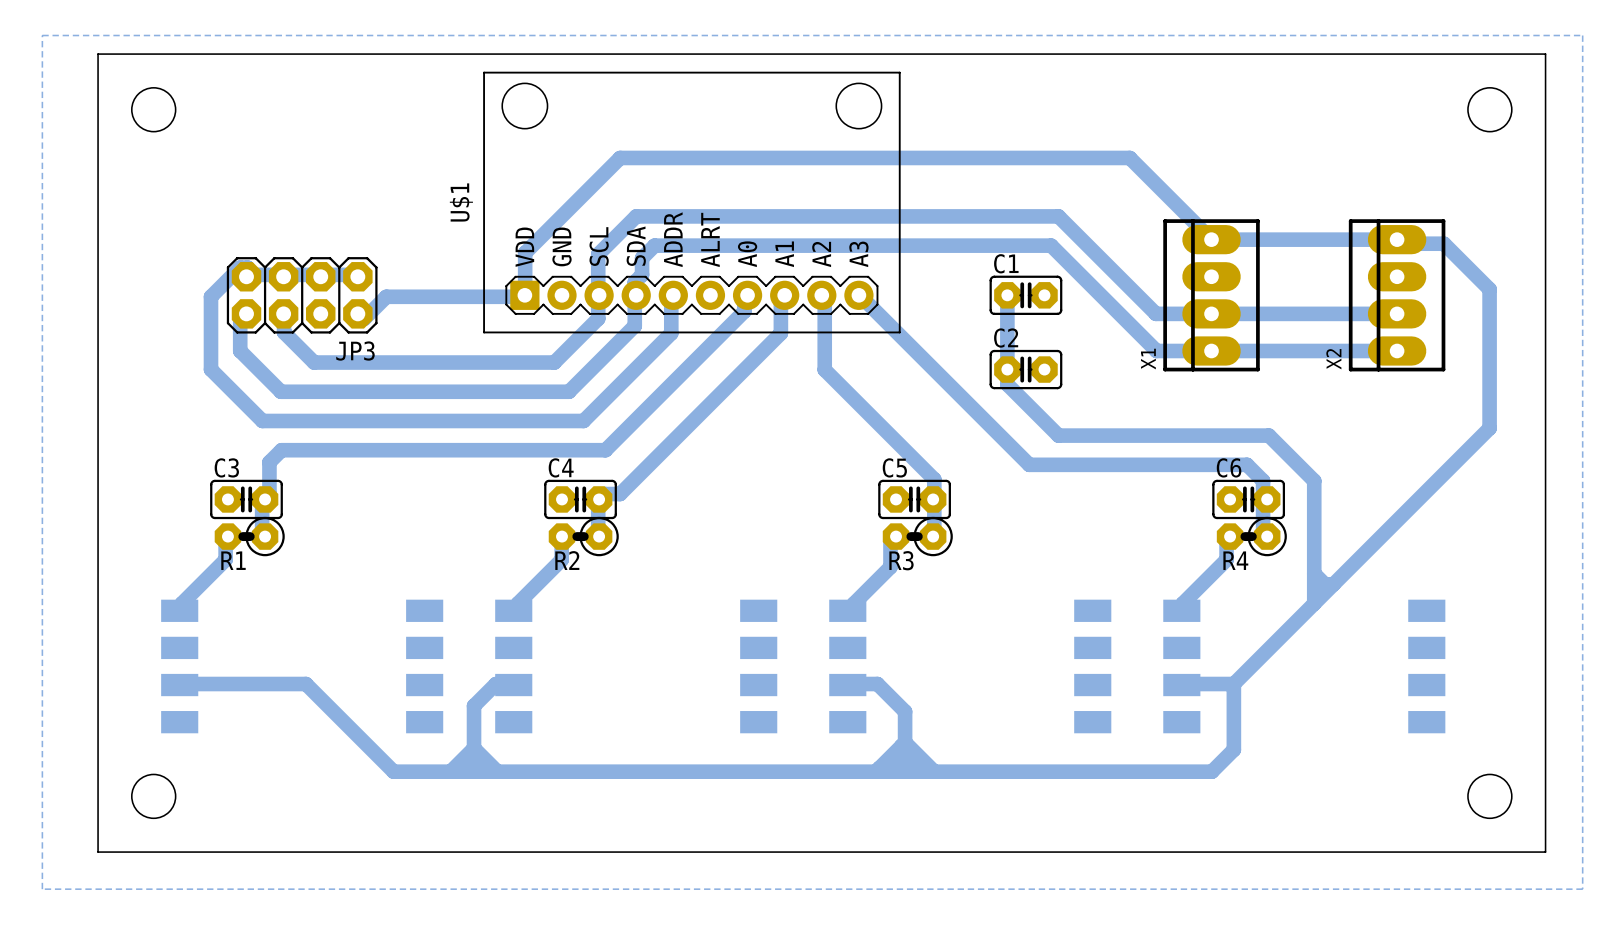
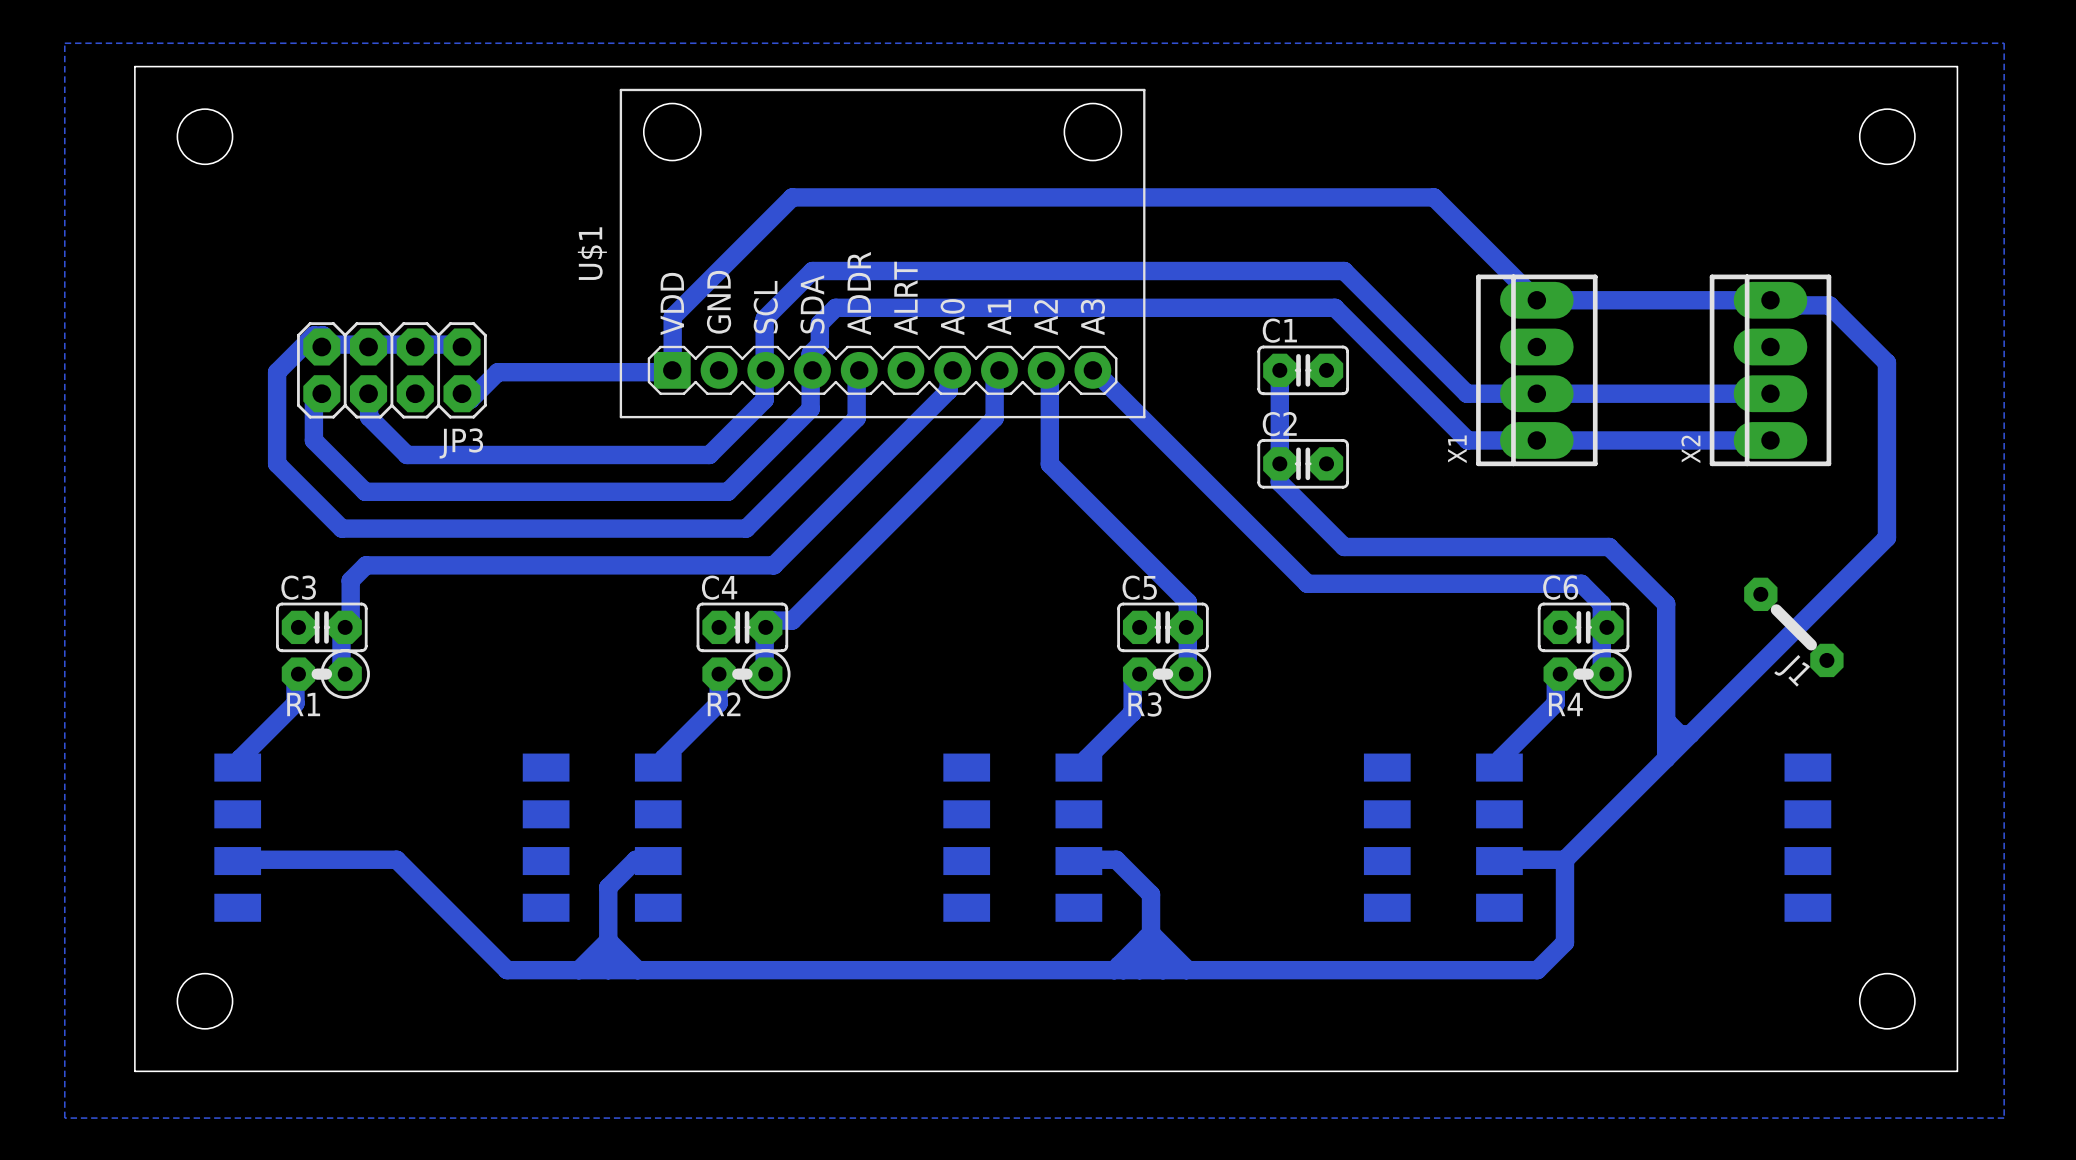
J1: none -> (1793, 627)

